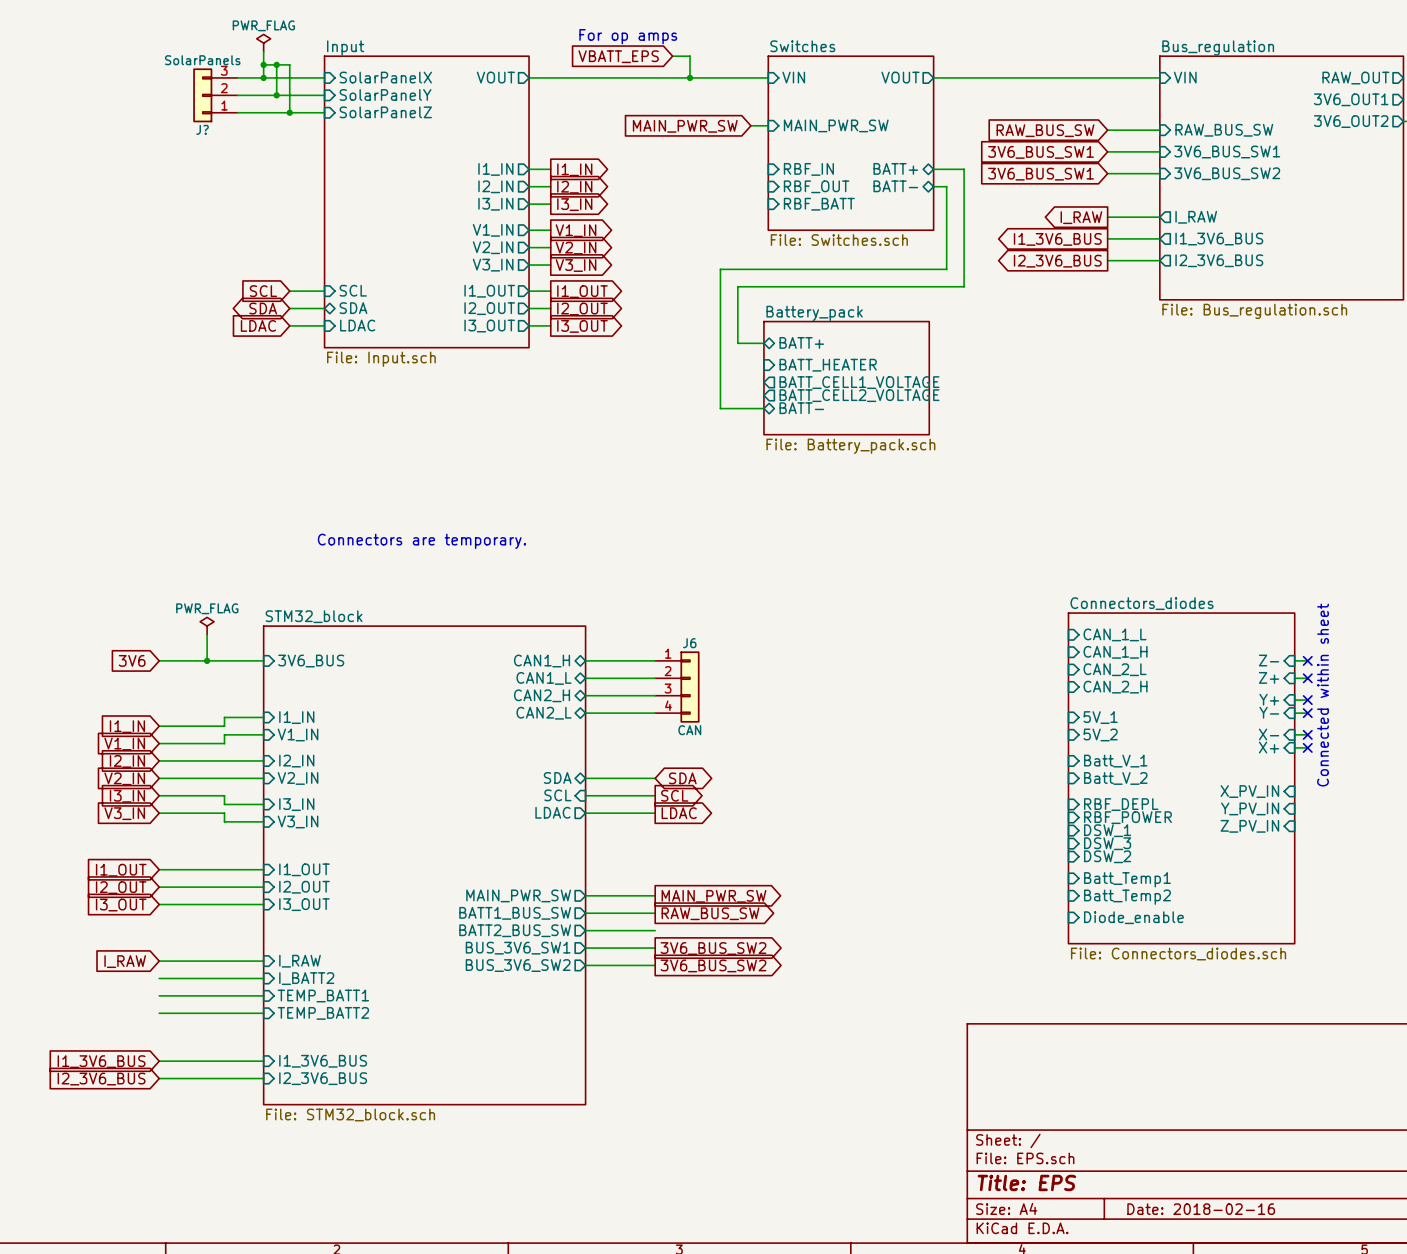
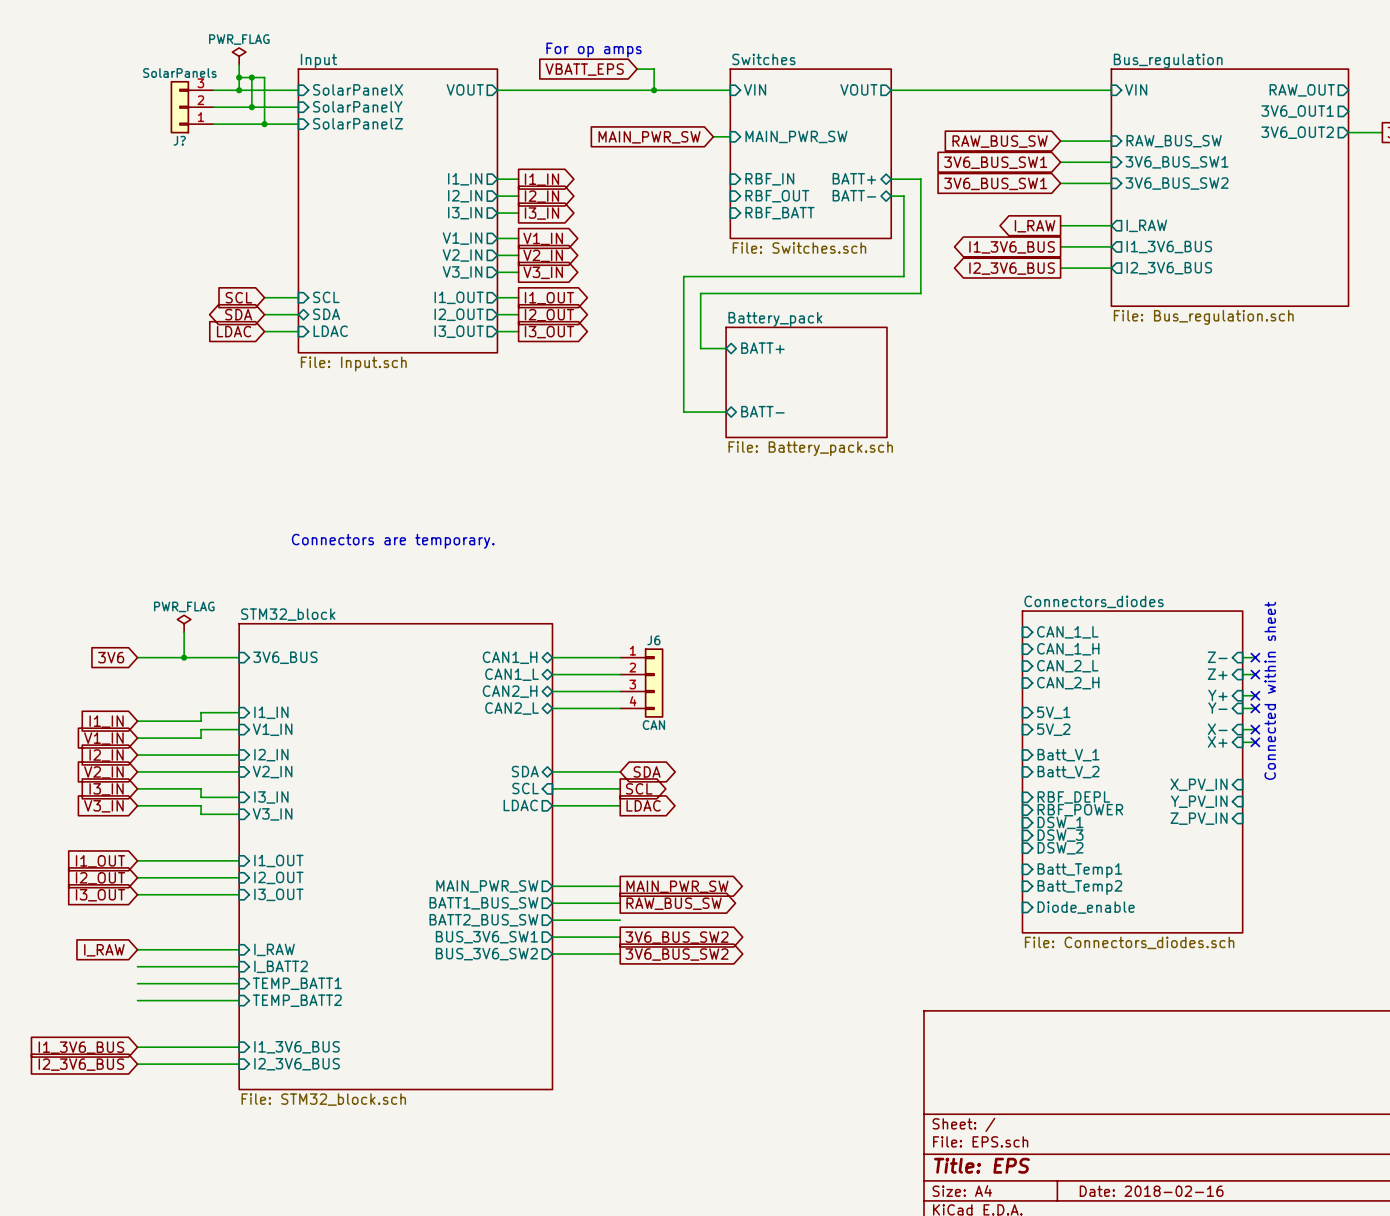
sheet pin: BATT_HEATER (828, 365) -> none
sheet pin: BATT_CELL1_VOLTAGE (859, 382) -> none
sheet pin: BATT_CELL2_VOLTAGE (859, 395) -> none

